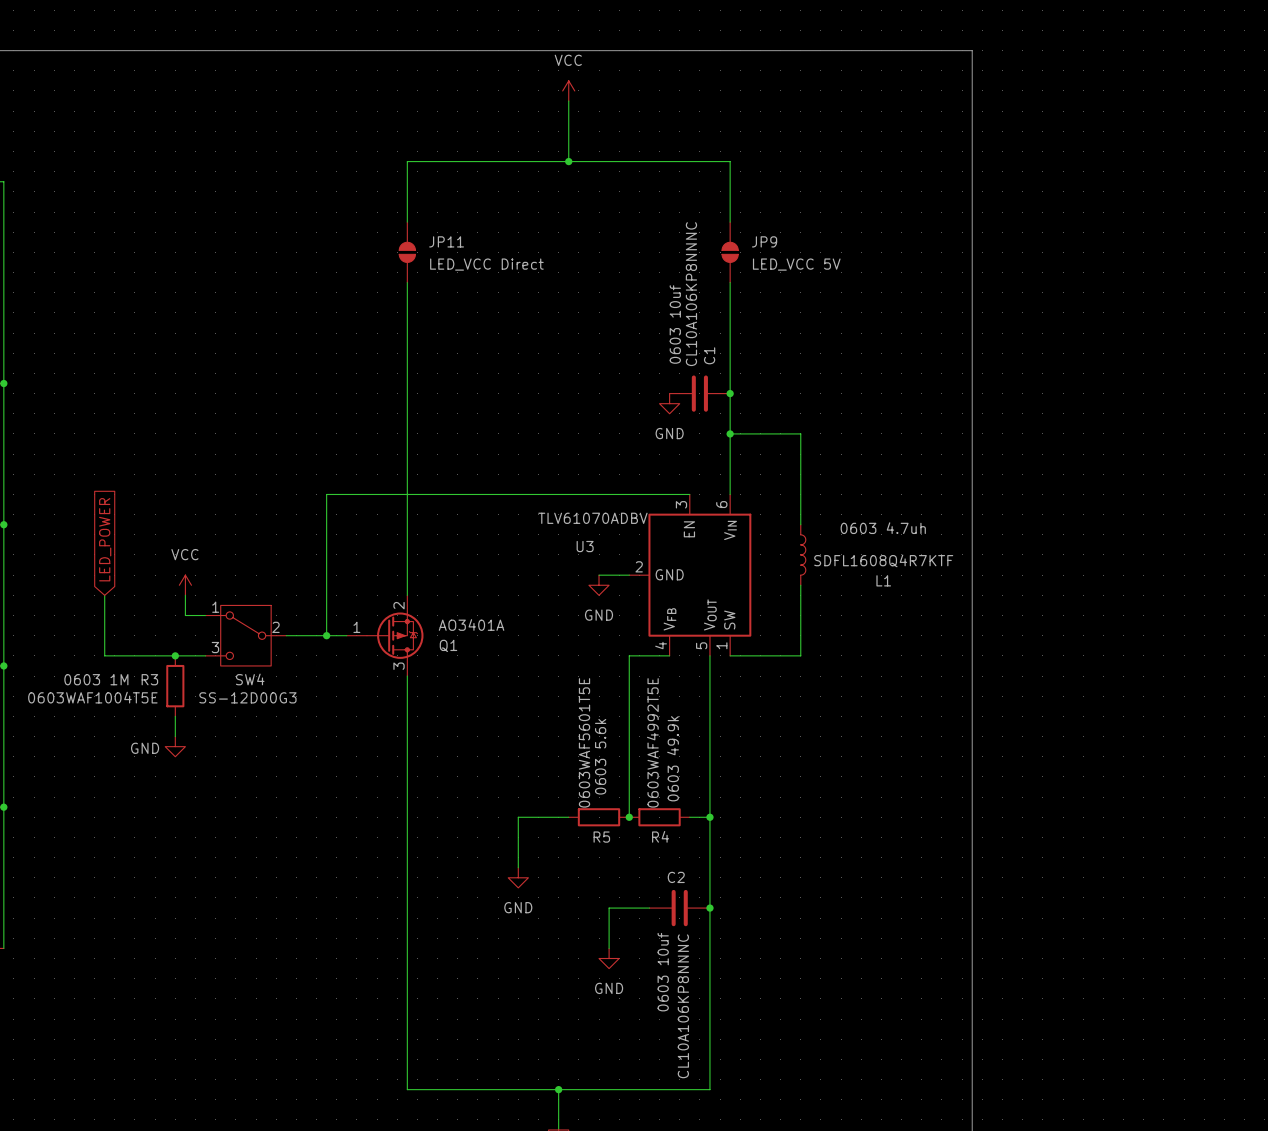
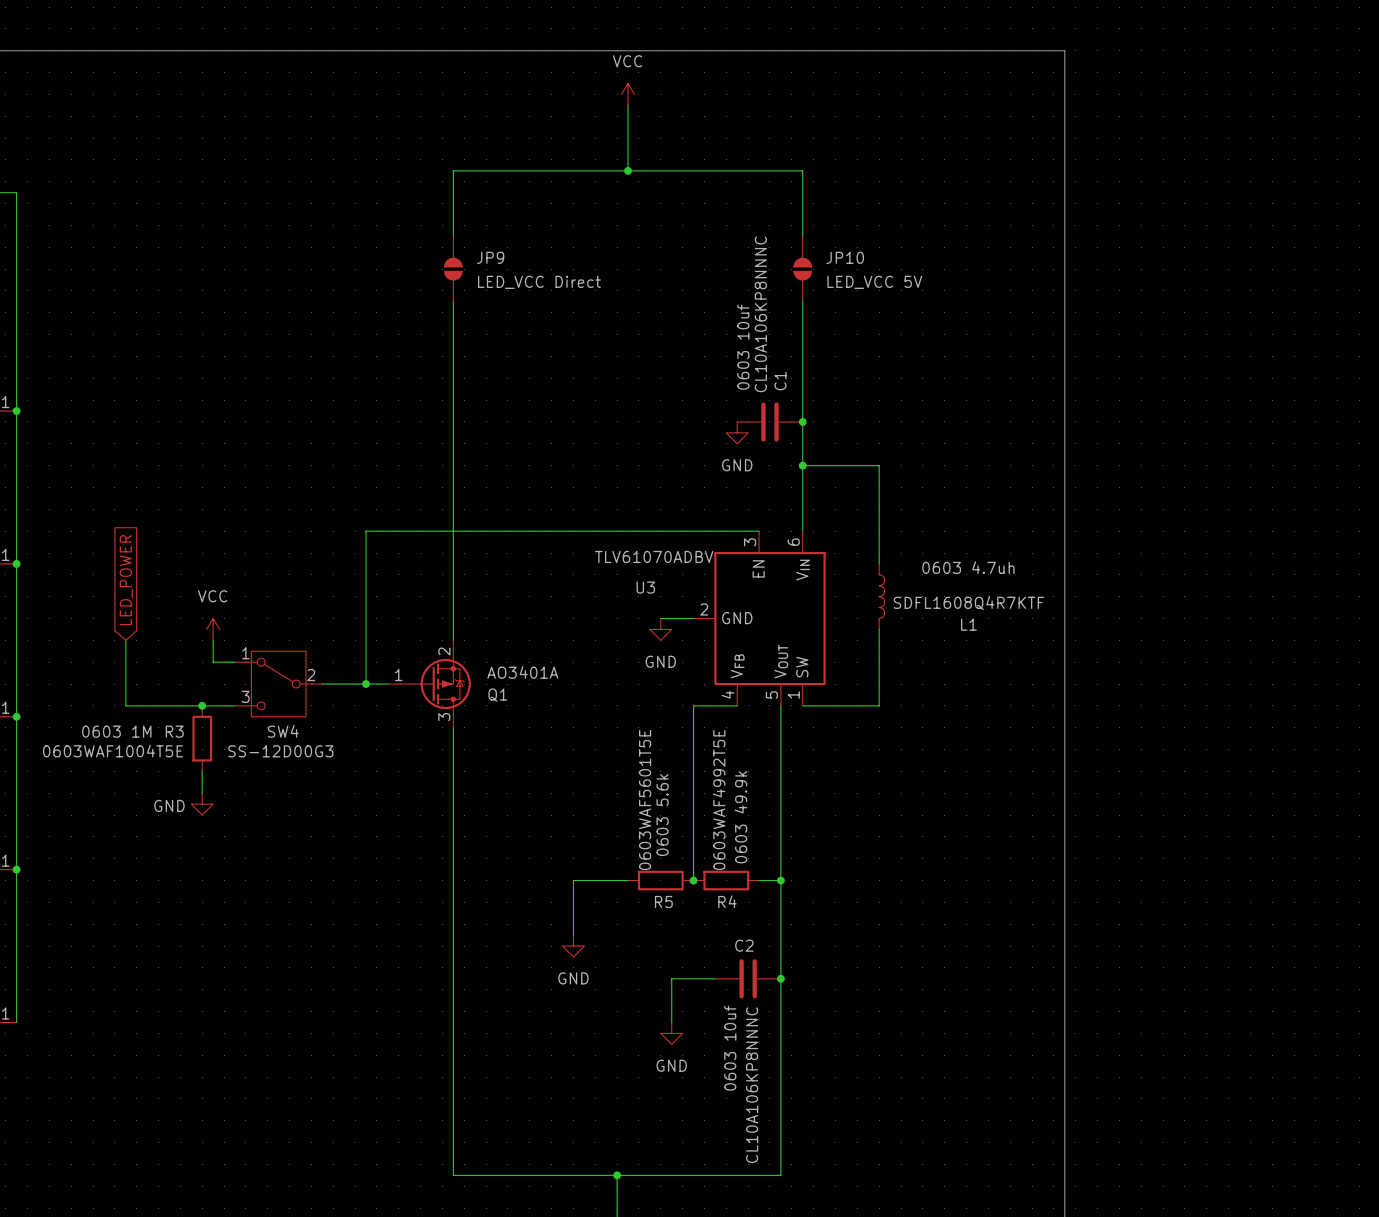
JP11 name: JP11 (446, 241) -> JP9 (490, 257)
JP9 name: JP9 (764, 241) -> JP10 (845, 257)

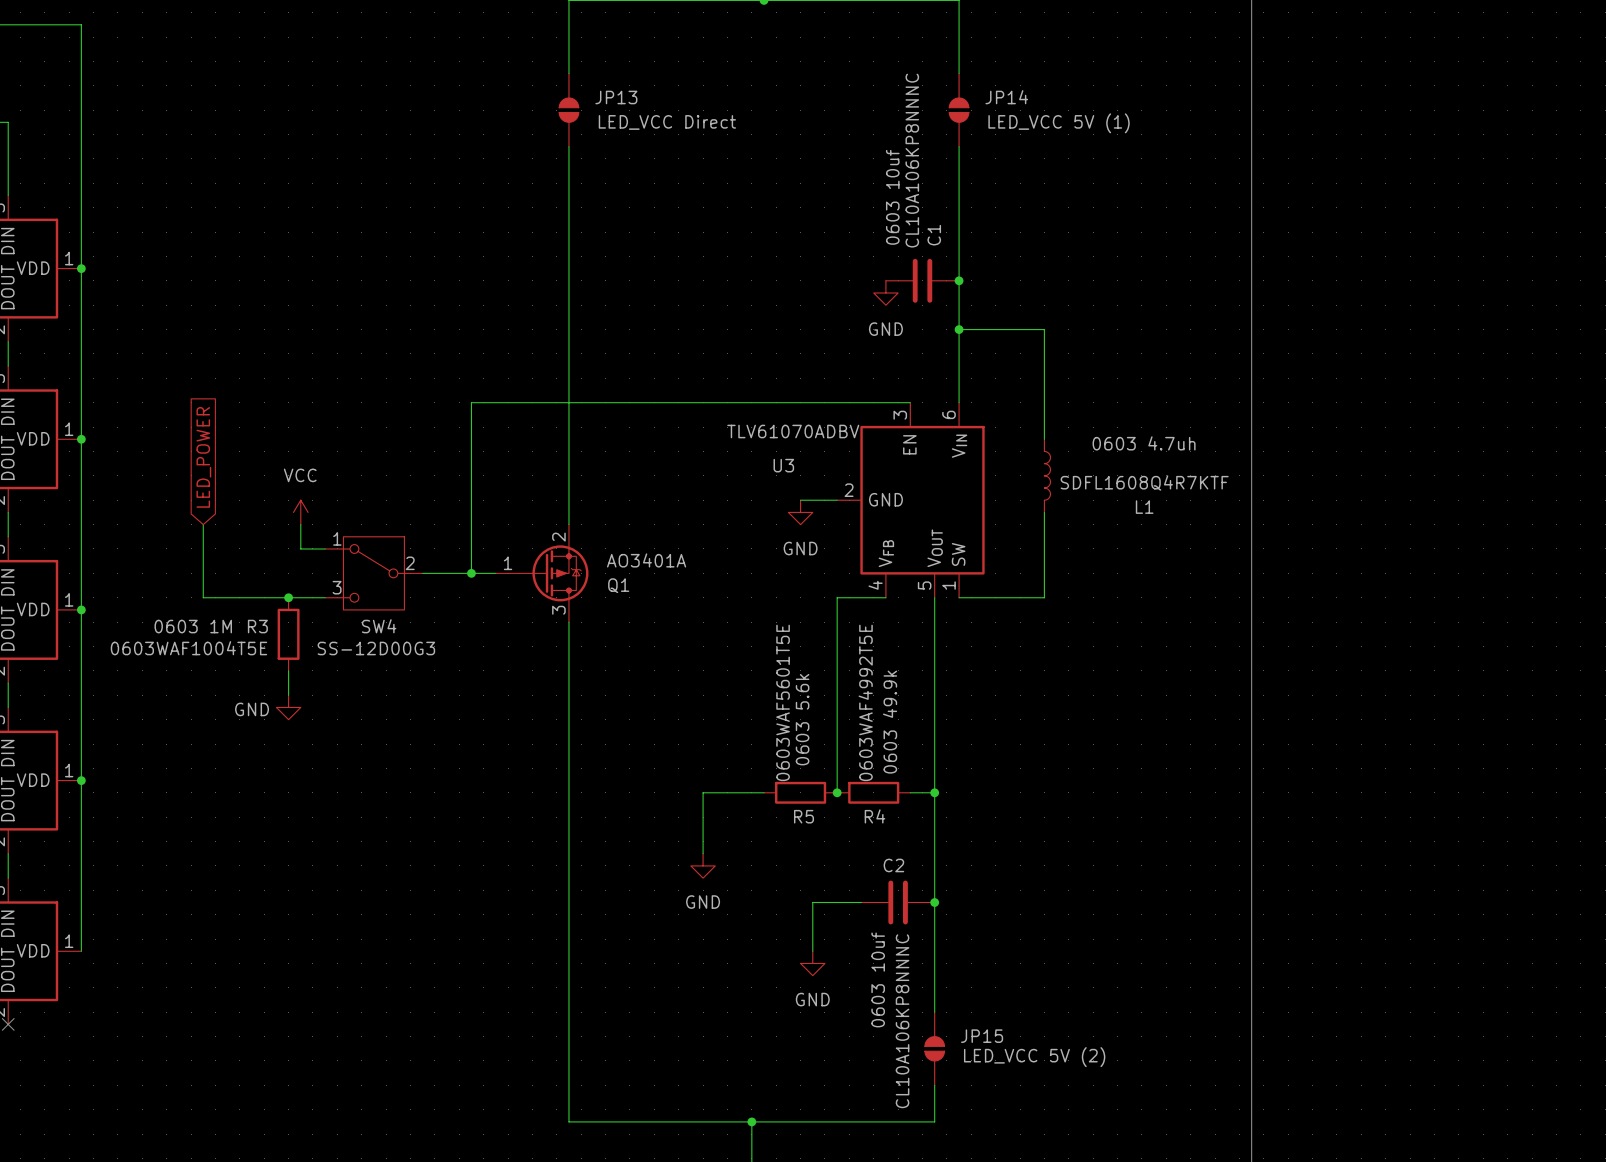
JP9 name: JP9 (490, 257) -> JP13 (616, 97)
JP10 name: JP10 (845, 257) -> JP14 (1006, 97)
JP9 text: none -> LED_VCC Direct (667, 122)
JP10 text: none -> LED_VCC 5V (1) (1059, 123)
JP9 value: LED_VCC Direct (539, 282) -> none
JP10 value: LED_VCC 5V (874, 282) -> none
JP15: none -> (934, 1048)

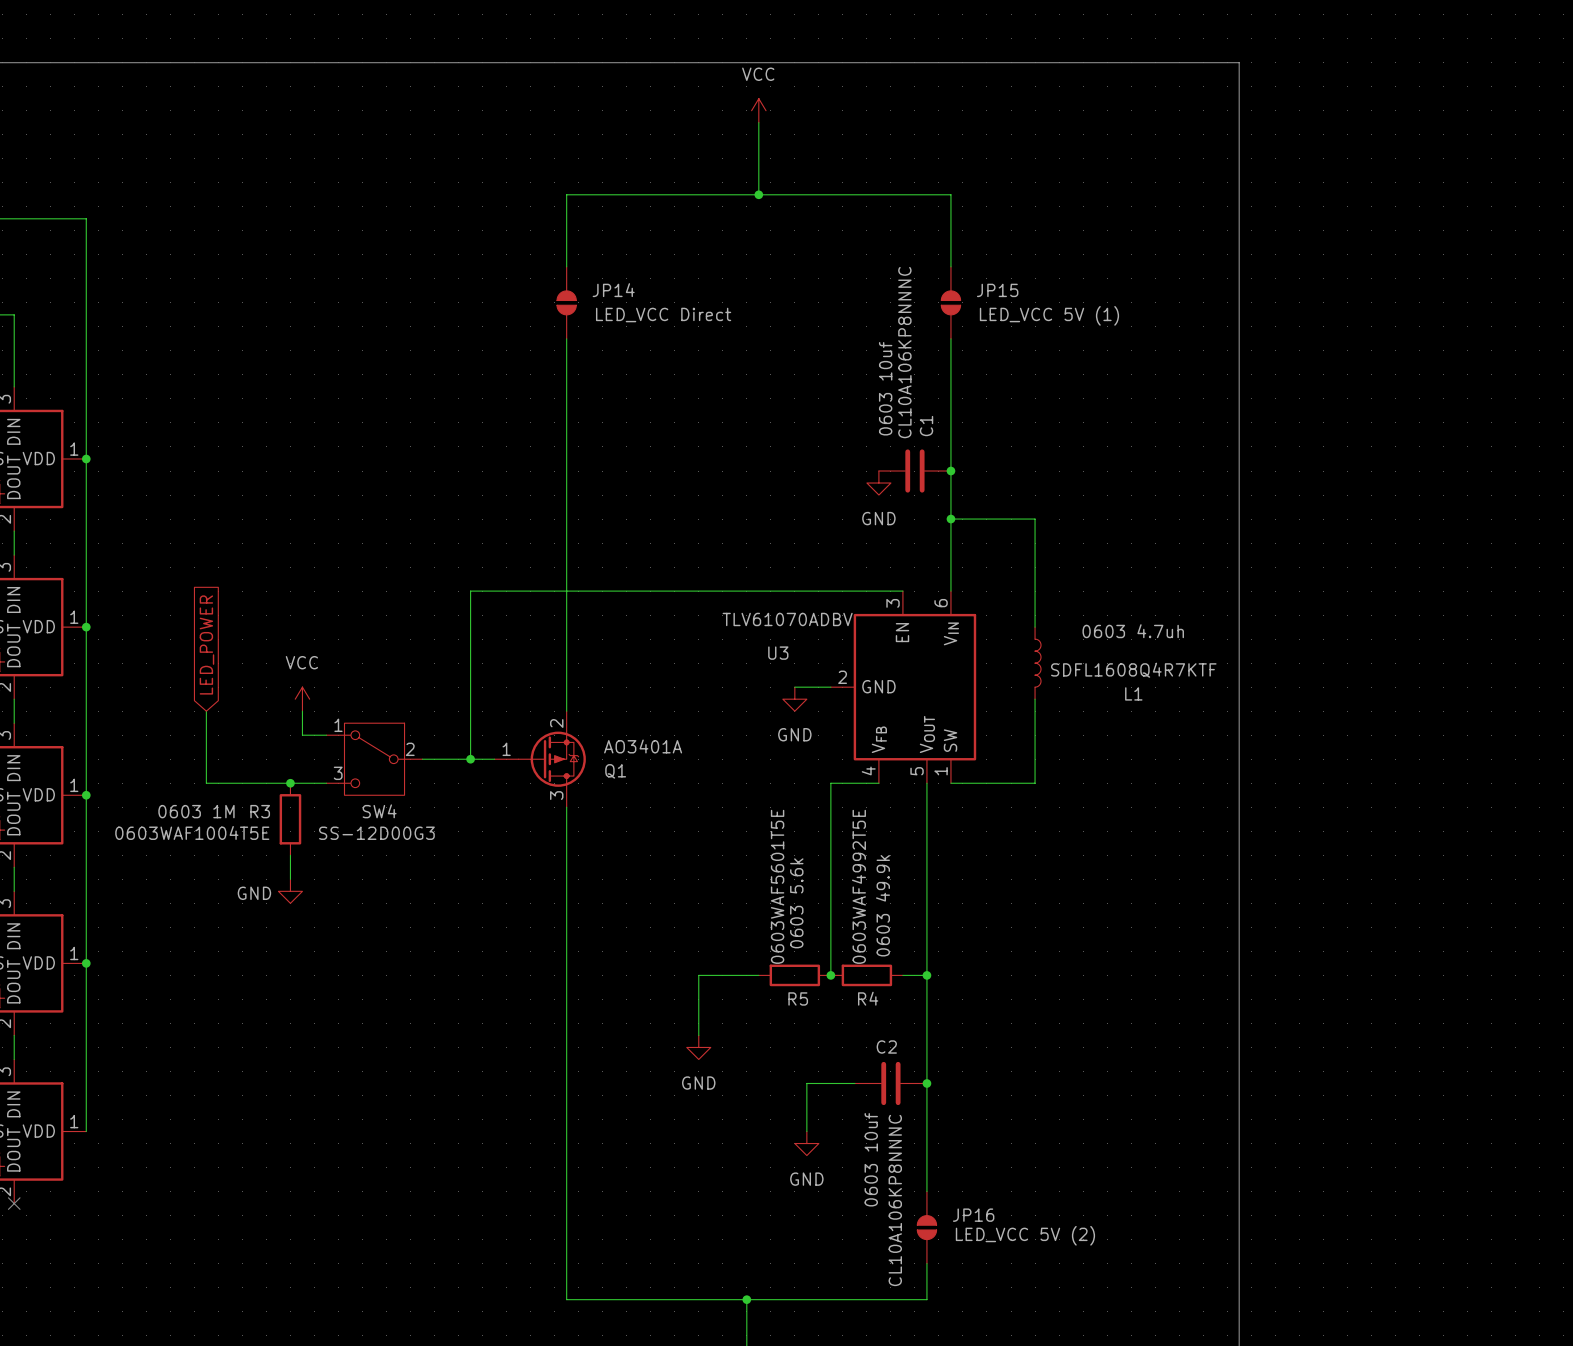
JP13 name: JP13 (616, 97) -> JP14 (613, 290)
JP14 name: JP14 (1006, 97) -> JP15 (997, 290)
JP15 name: JP15 (982, 1036) -> JP16 (973, 1215)

